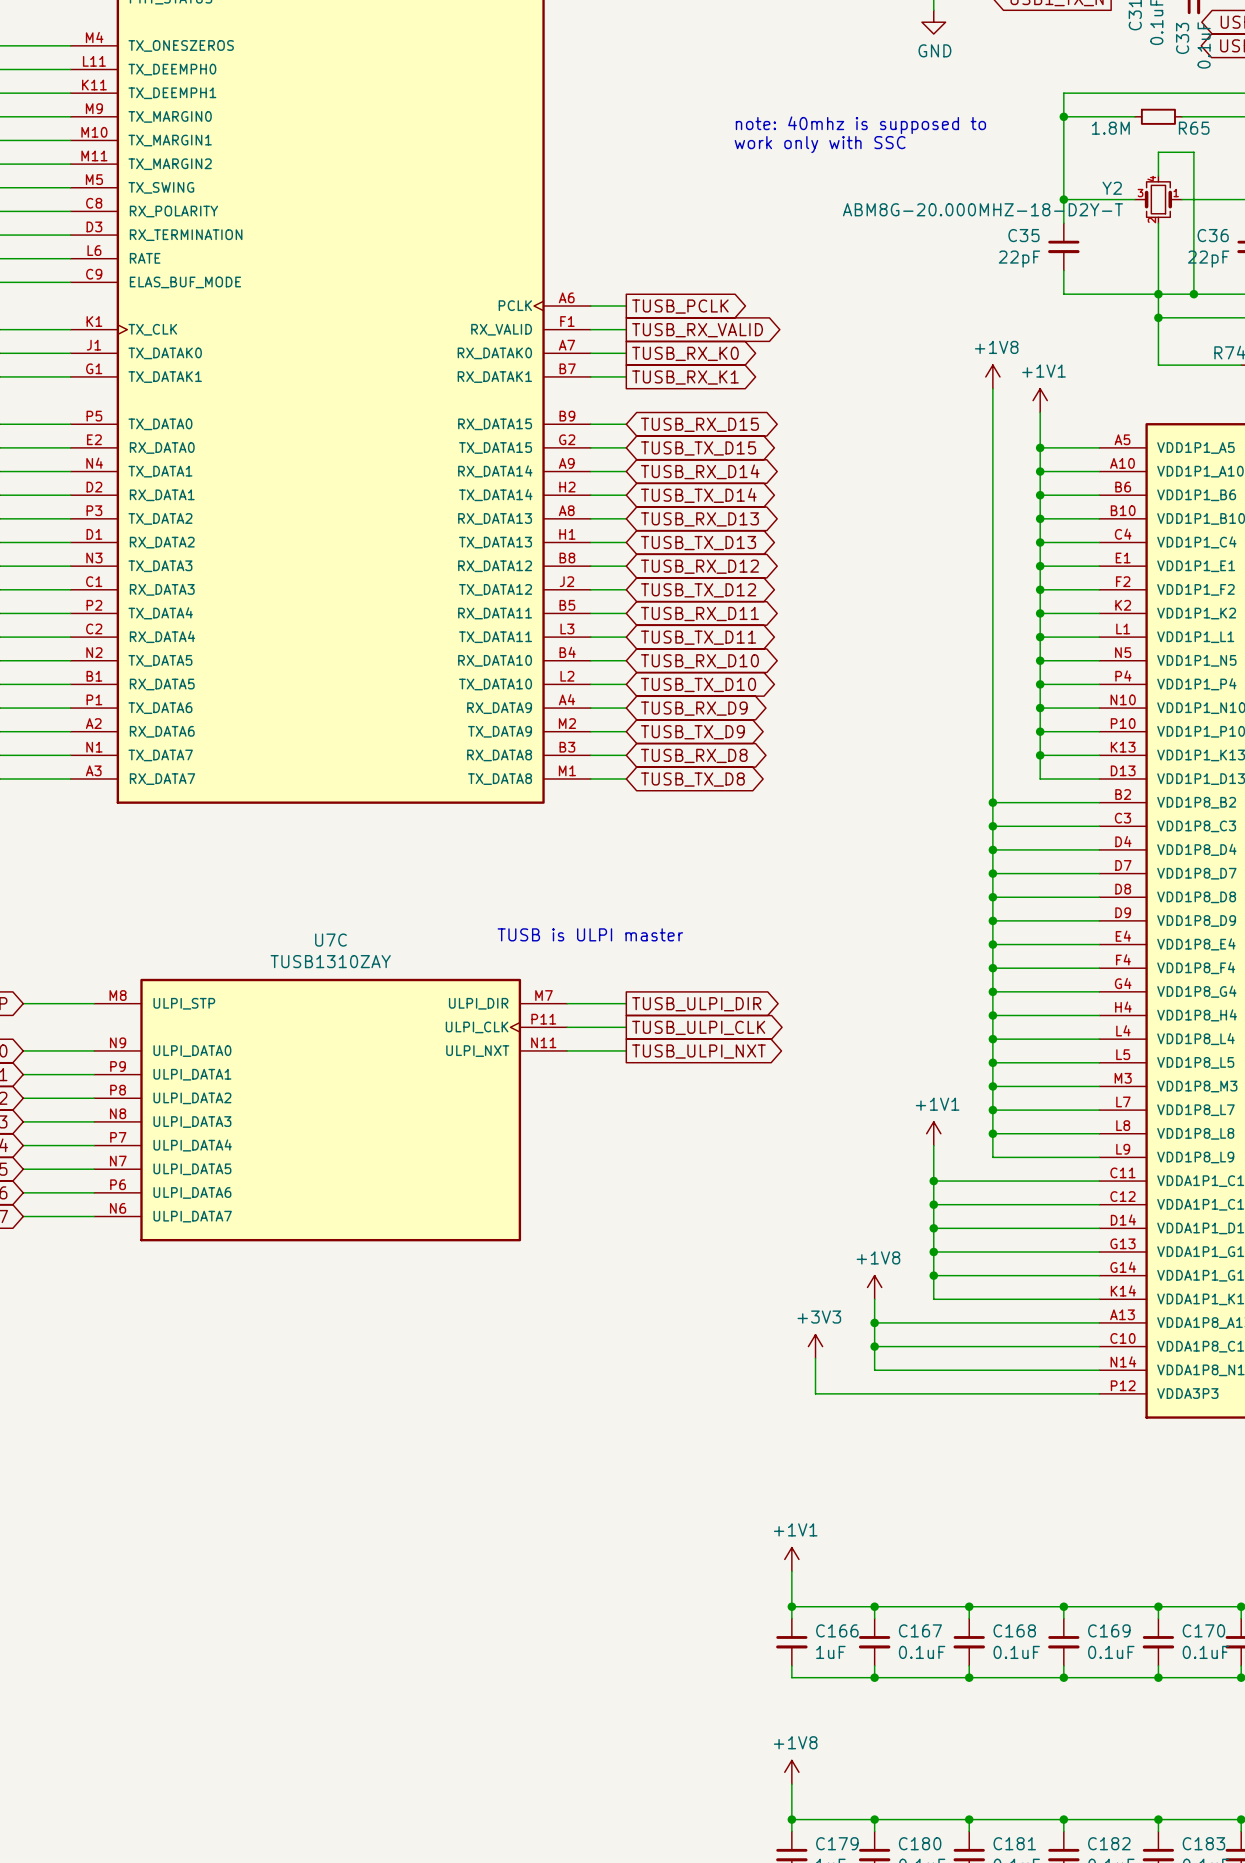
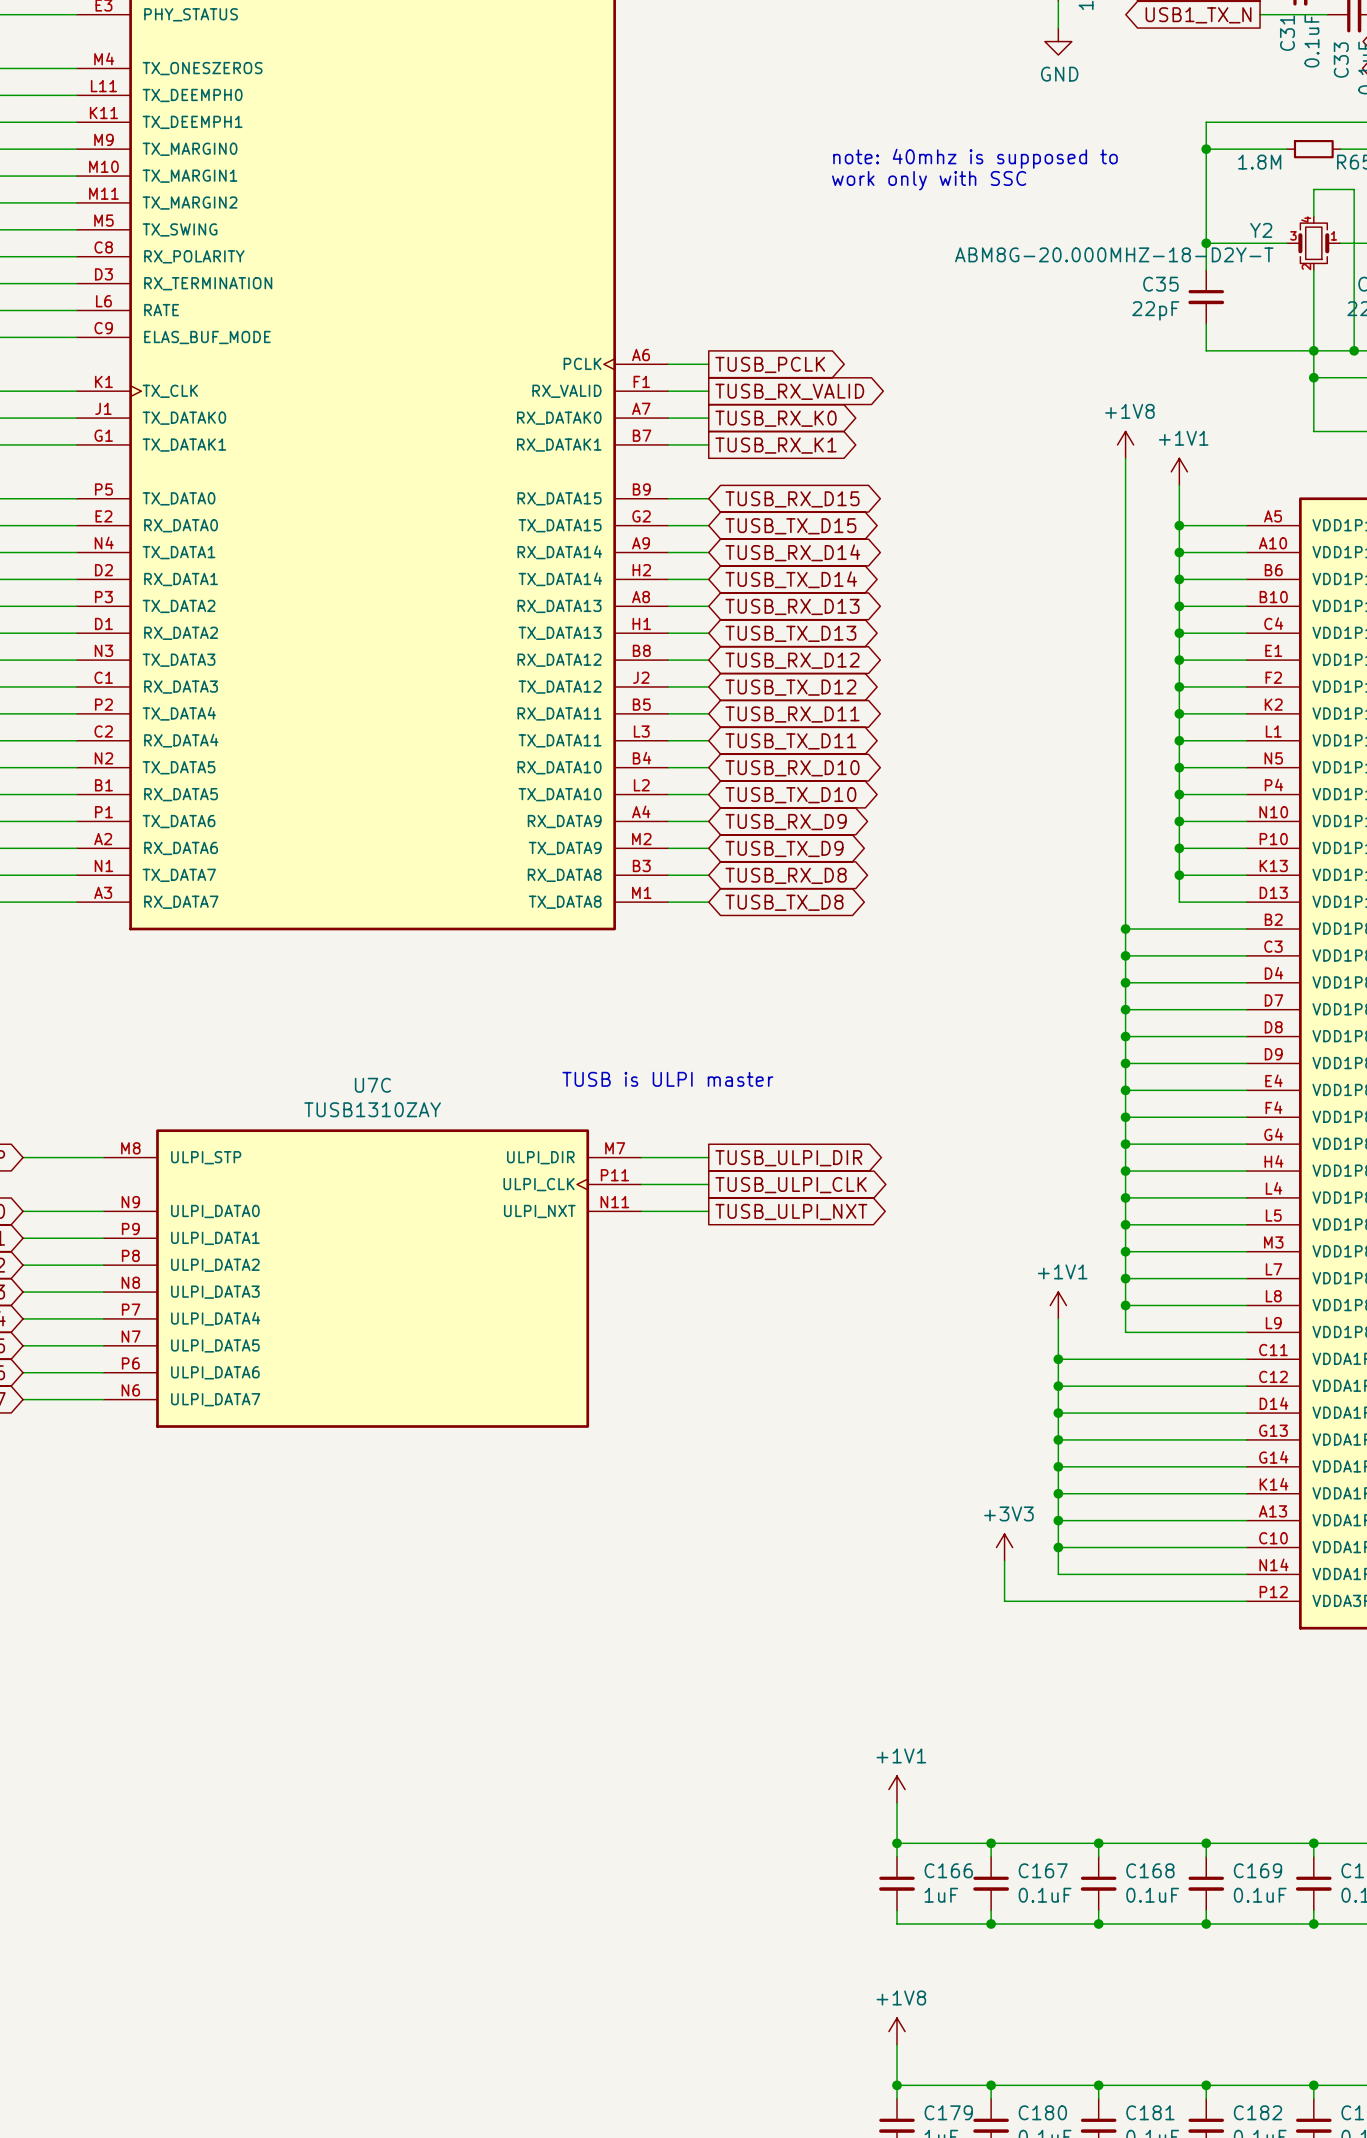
power symbol: +1V8 (874, 1287) -> none
wire: (874, 1299) (874, 1370) (933, 1370) -> (1058, 1493) (1058, 1574)
junction: none -> (1058, 1493)
wire: (874, 1322) (933, 1322) -> none
junction: (874, 1322) -> none
junction: none -> (1058, 1520)
power symbol position: +3V3 (815, 1346) -> +3V3 (1004, 1547)
wire: (874, 1346) (933, 1346) -> none
junction: (874, 1346) -> none
junction: none -> (1058, 1547)
wire: (815, 1358) (815, 1393) (886, 1393) -> (1004, 1560) (1004, 1601)

